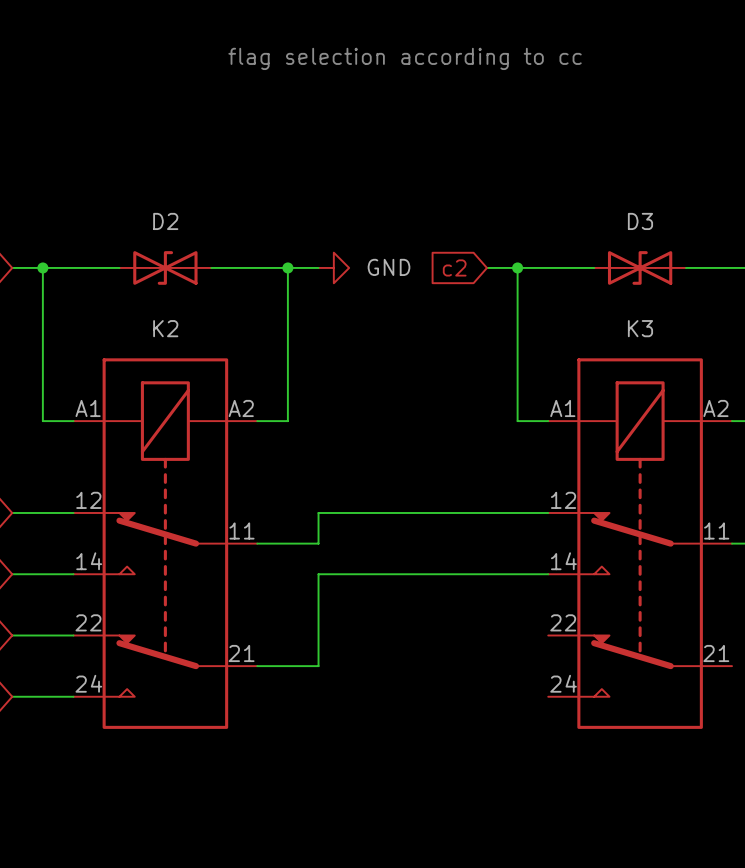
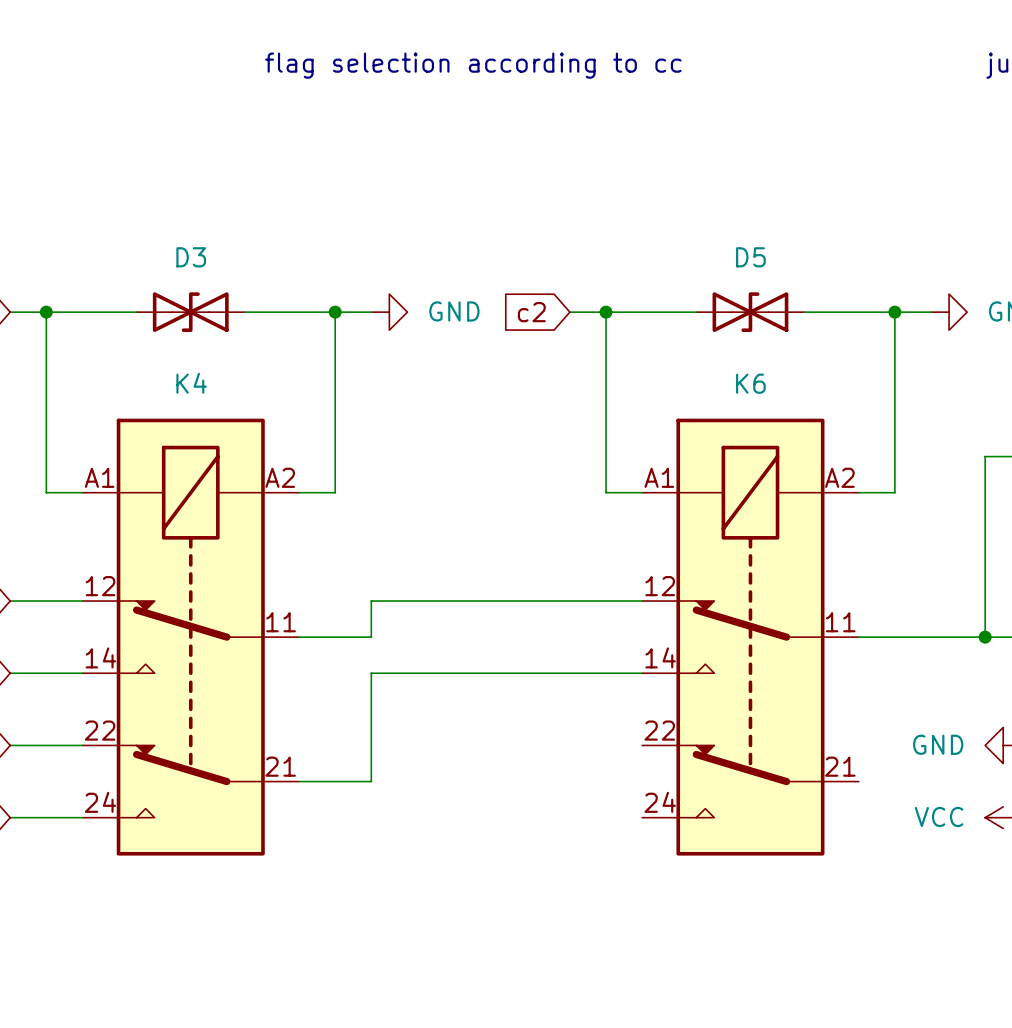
D2 name: D2 (165, 221) -> D3 (191, 257)
D3 name: D3 (640, 221) -> D5 (750, 257)
K2 name: K2 (165, 328) -> K4 (191, 383)
K3 name: K3 (640, 328) -> K6 (750, 383)

